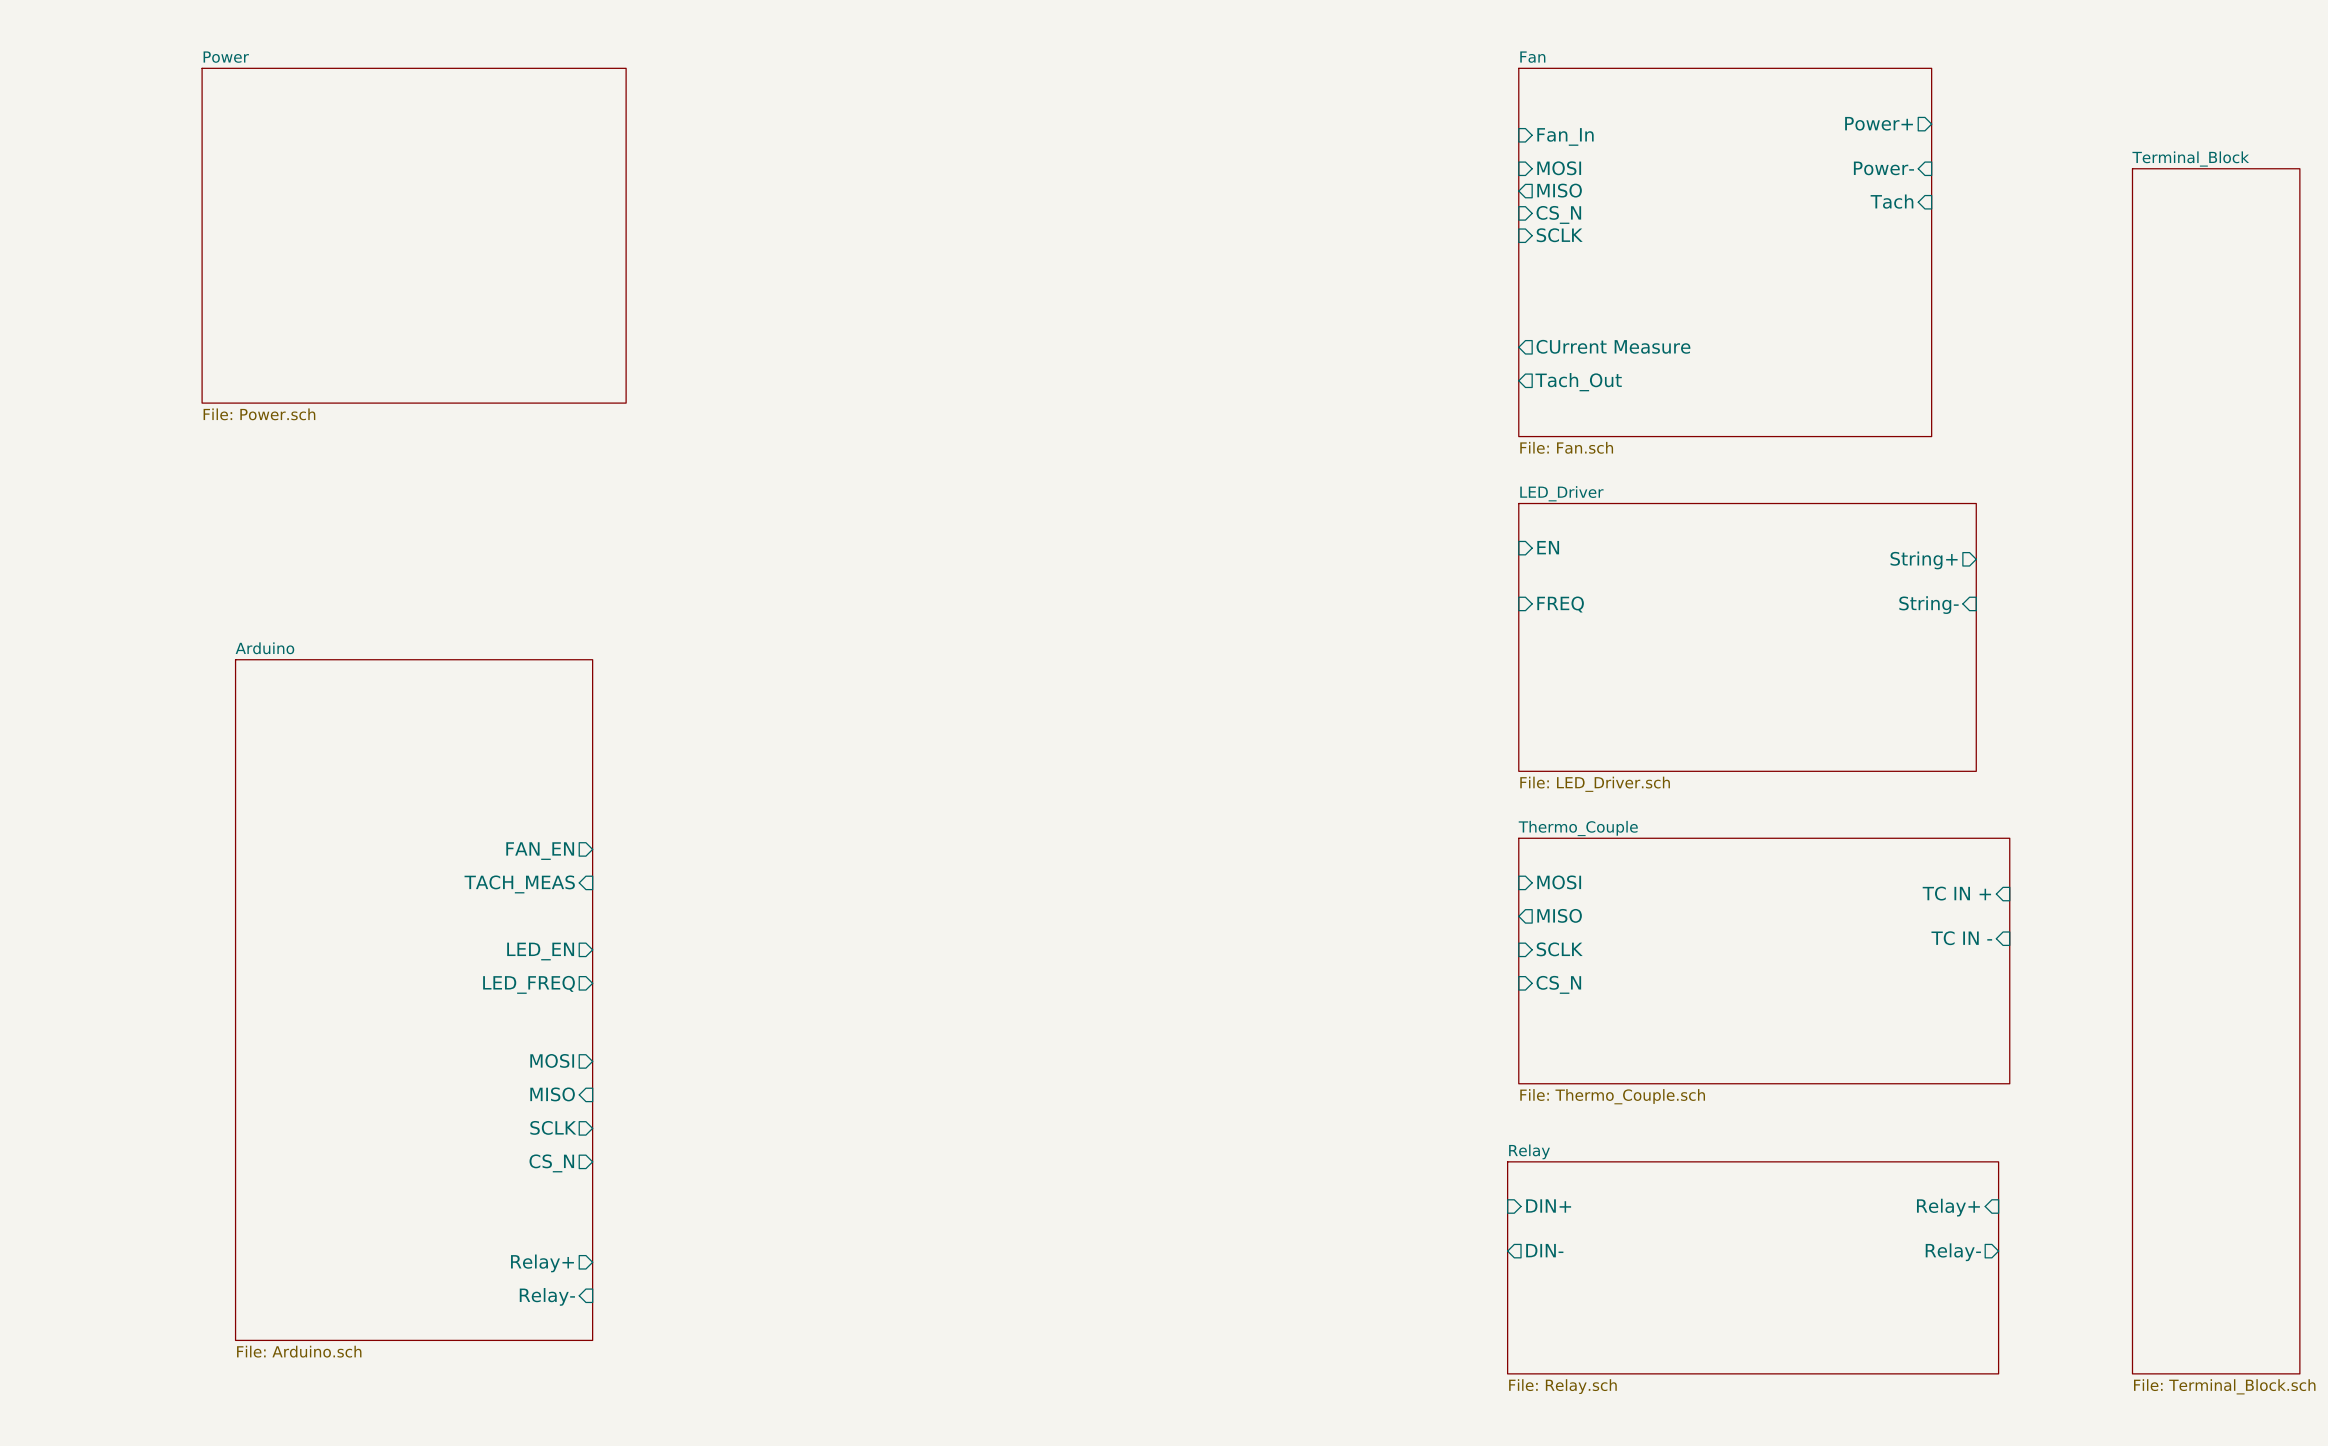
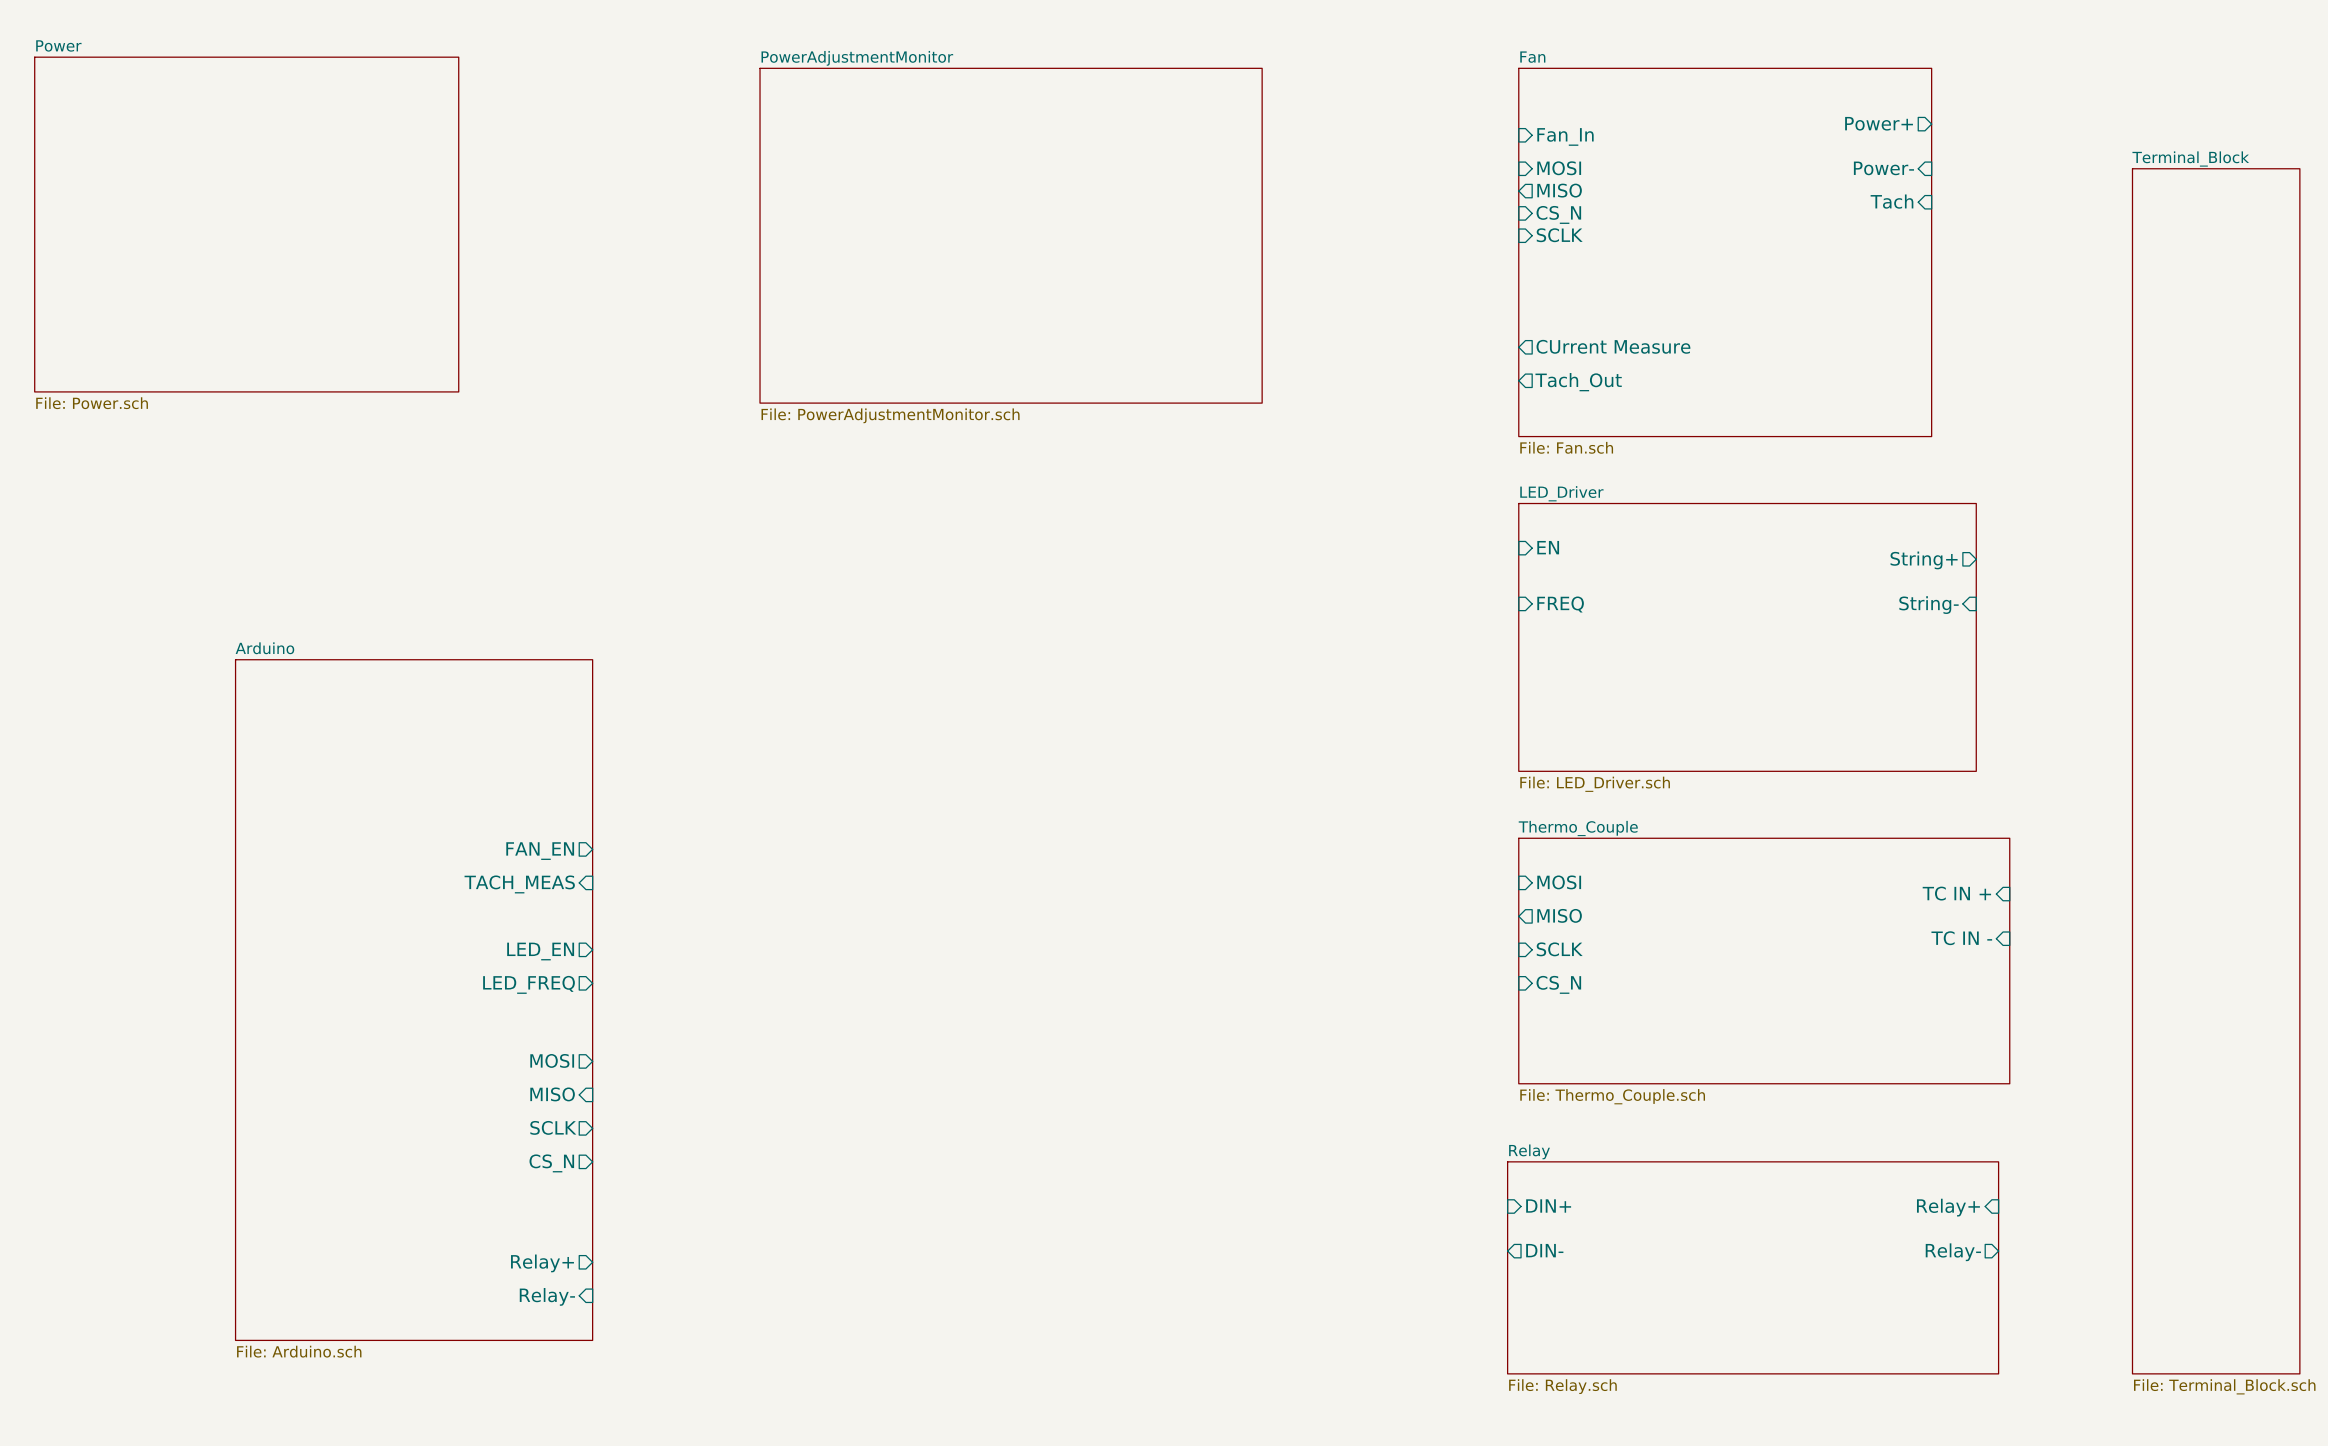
sheet Power position: (414, 235) -> (246, 224)
sheet PowerAdjustmentMonitor: none -> File: PowerAdjustmentMonitor.sch (1011, 235)

